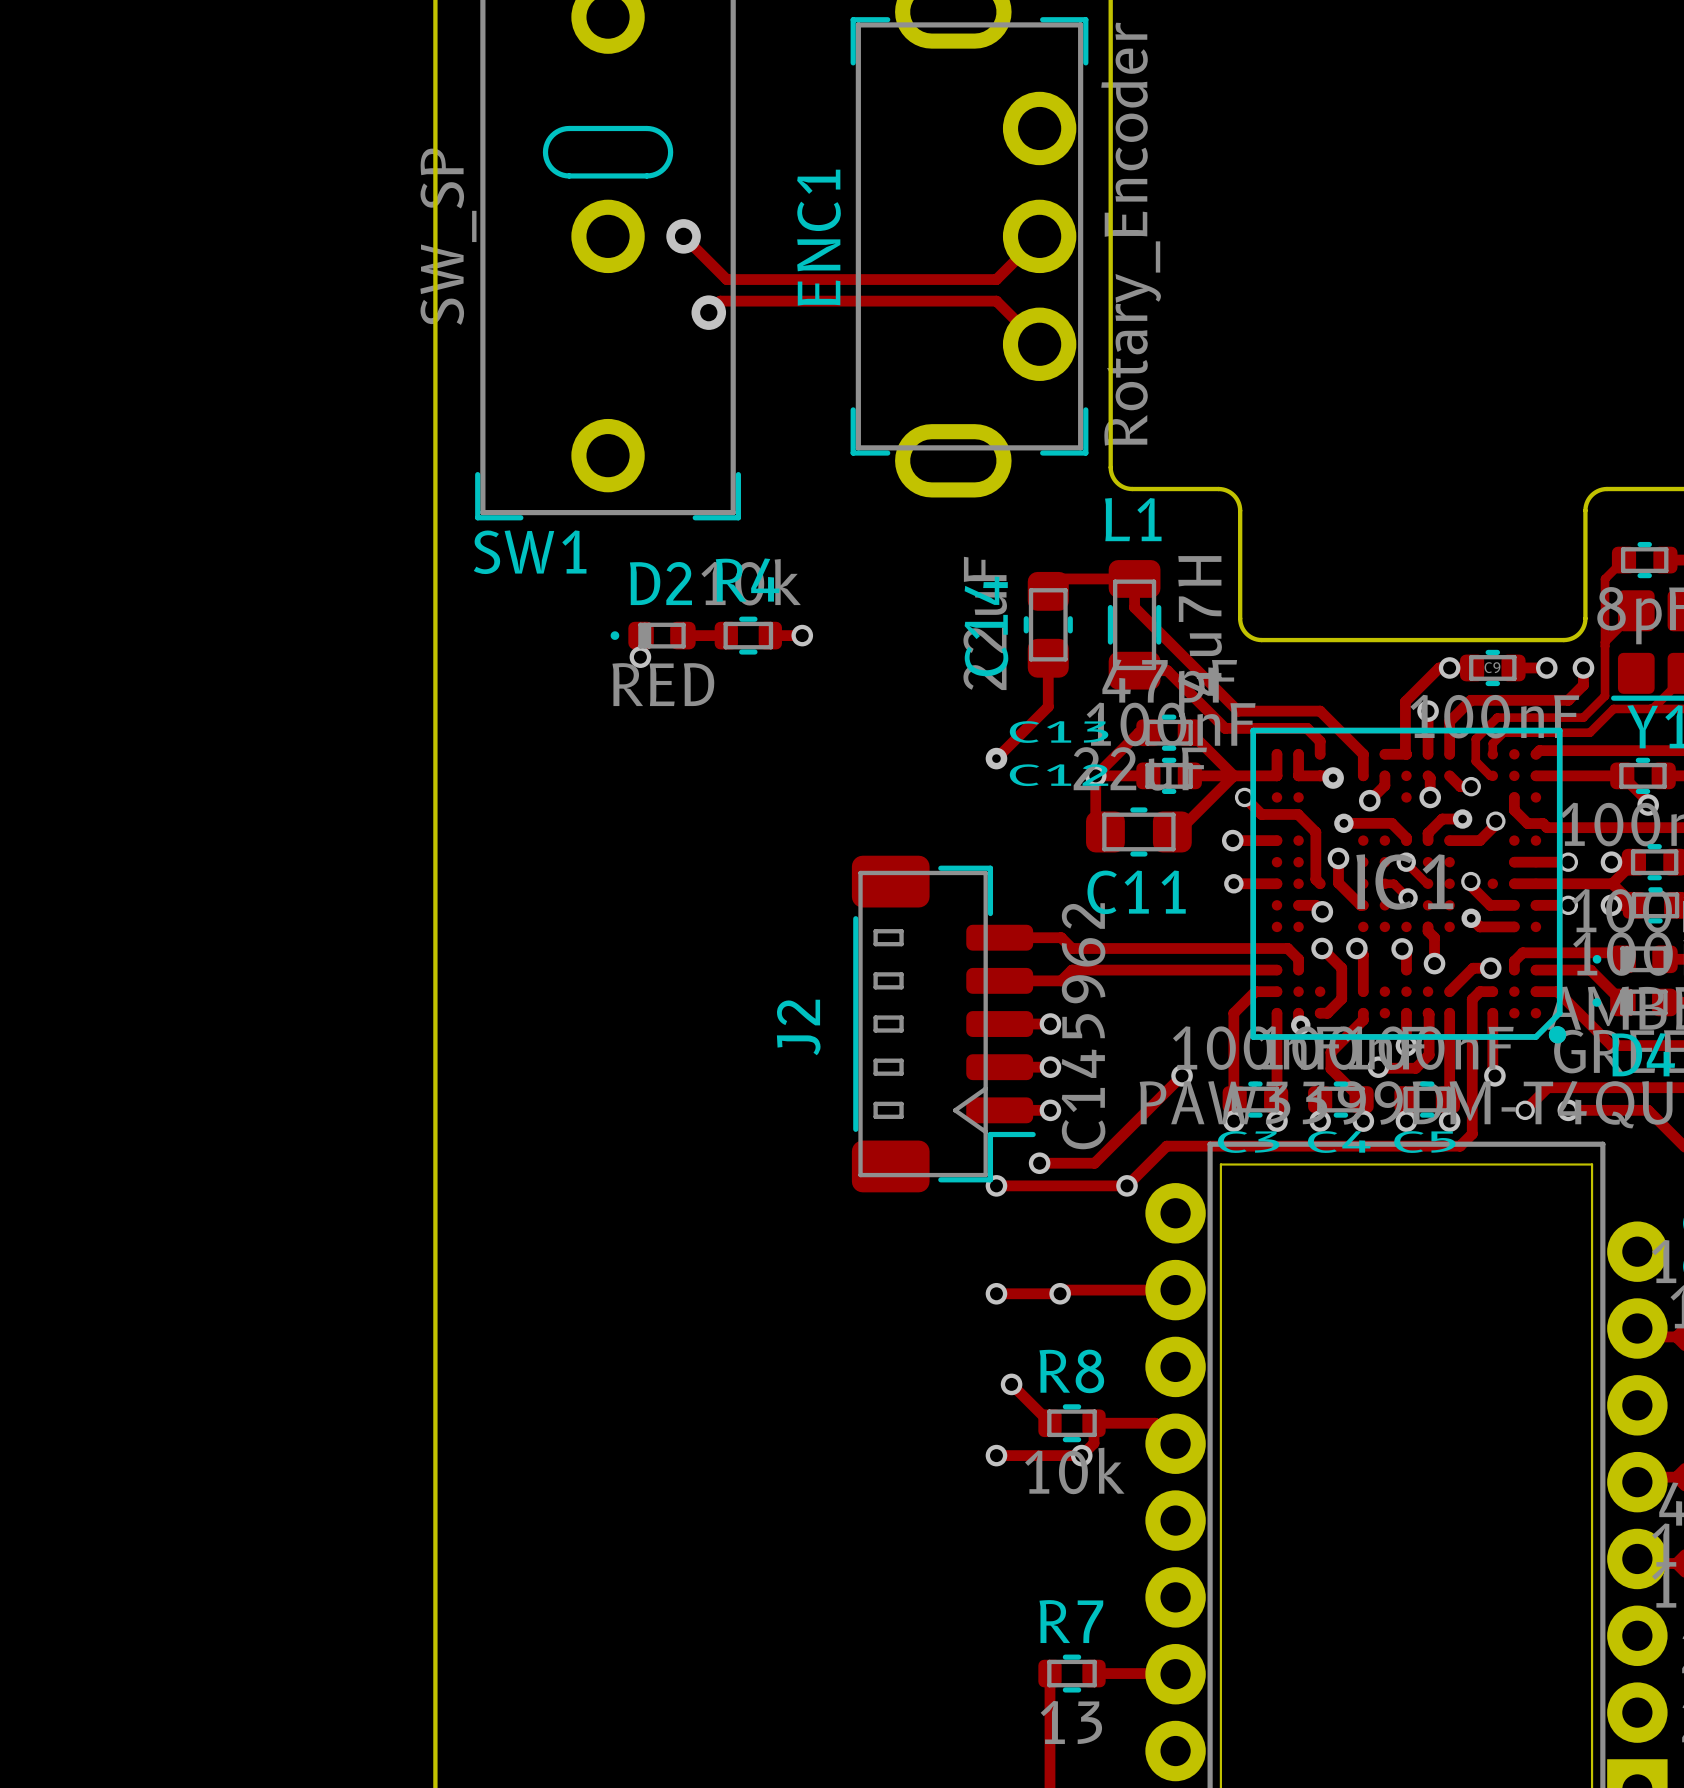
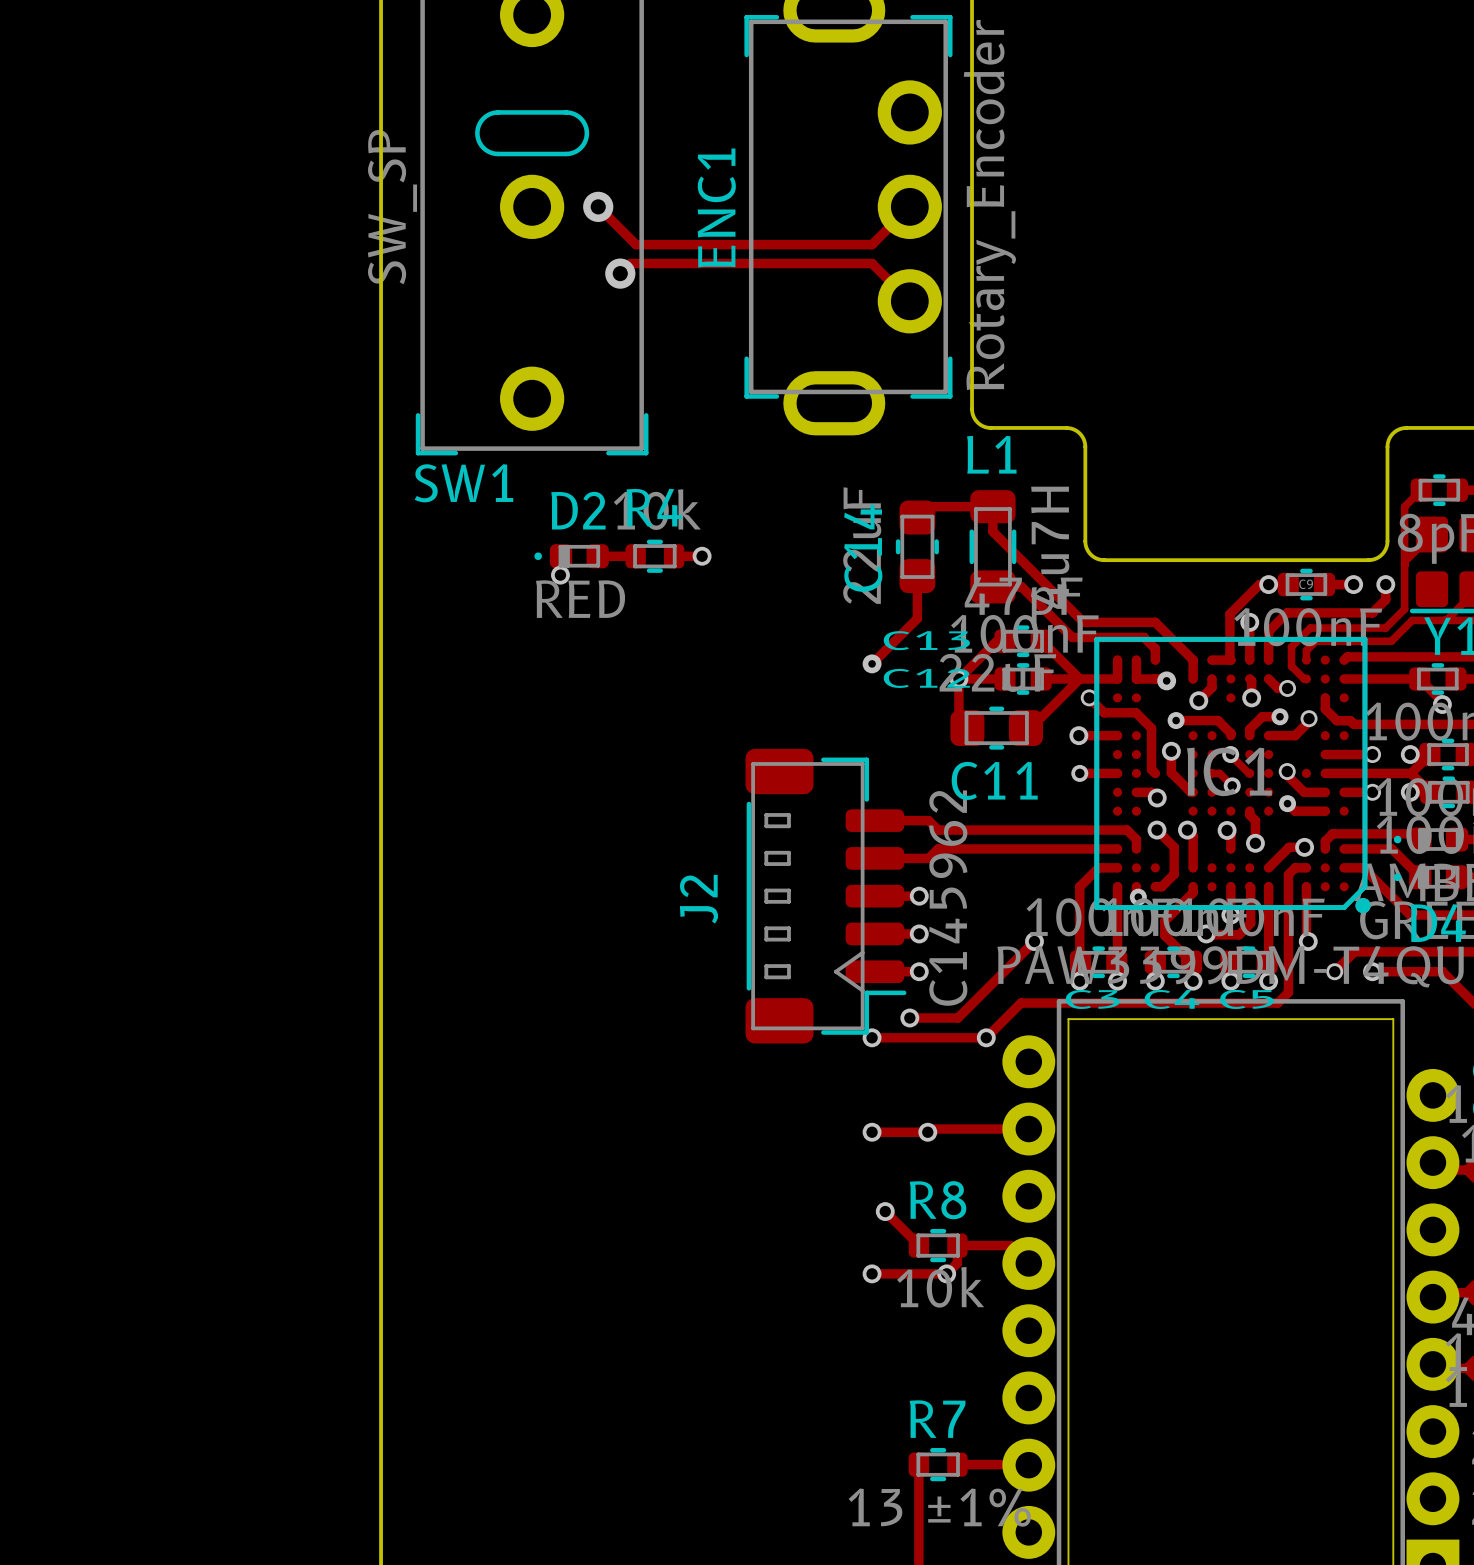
R7 value: 13 (1071, 1722) -> 13 ±1% (939, 1507)

